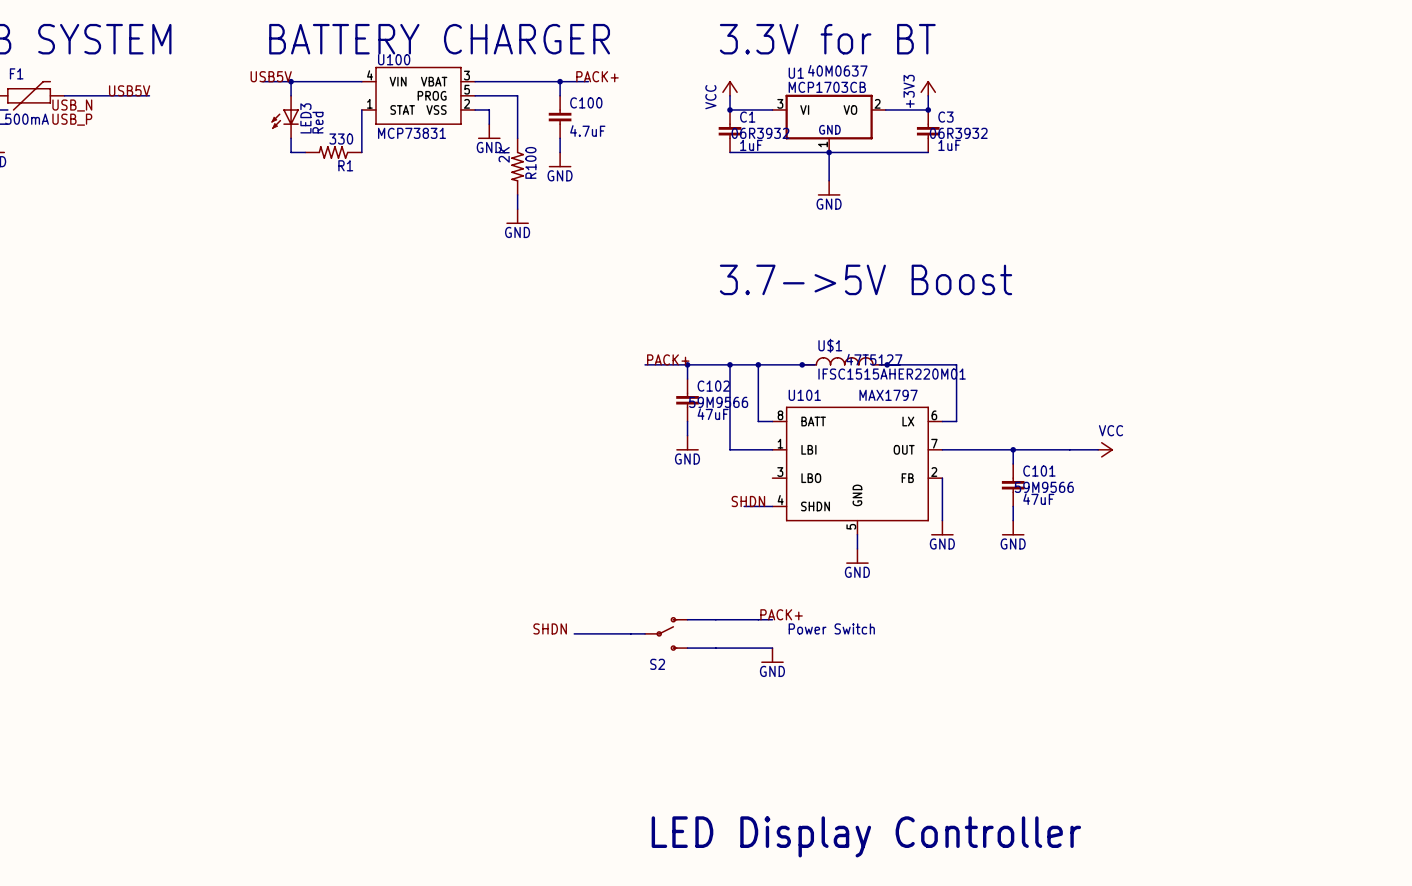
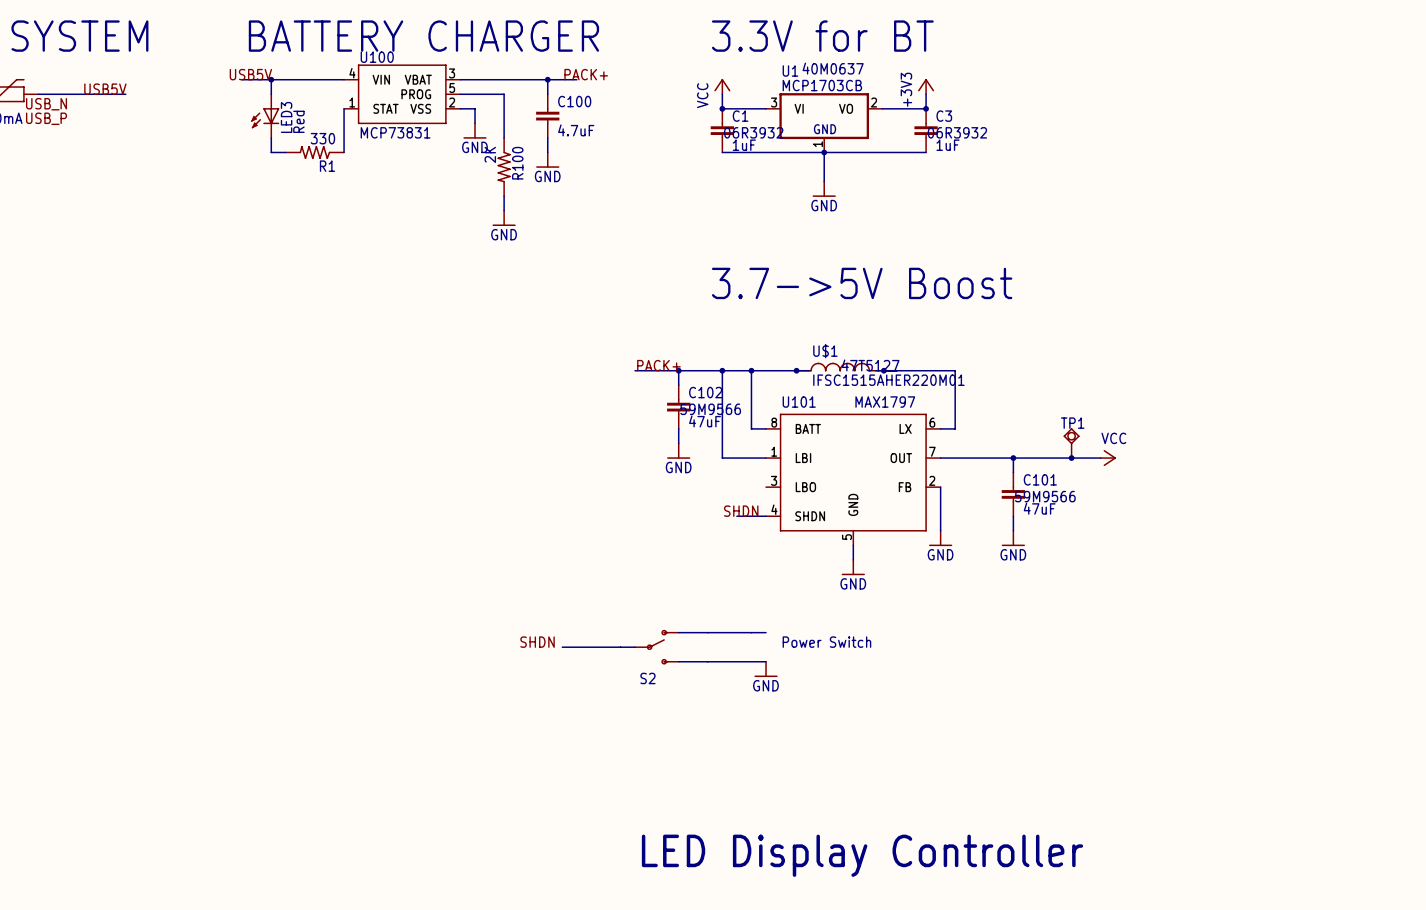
TP1: none -> (1071, 443)
junction: none -> (1071, 458)
label: PACK+ (781, 614) -> none

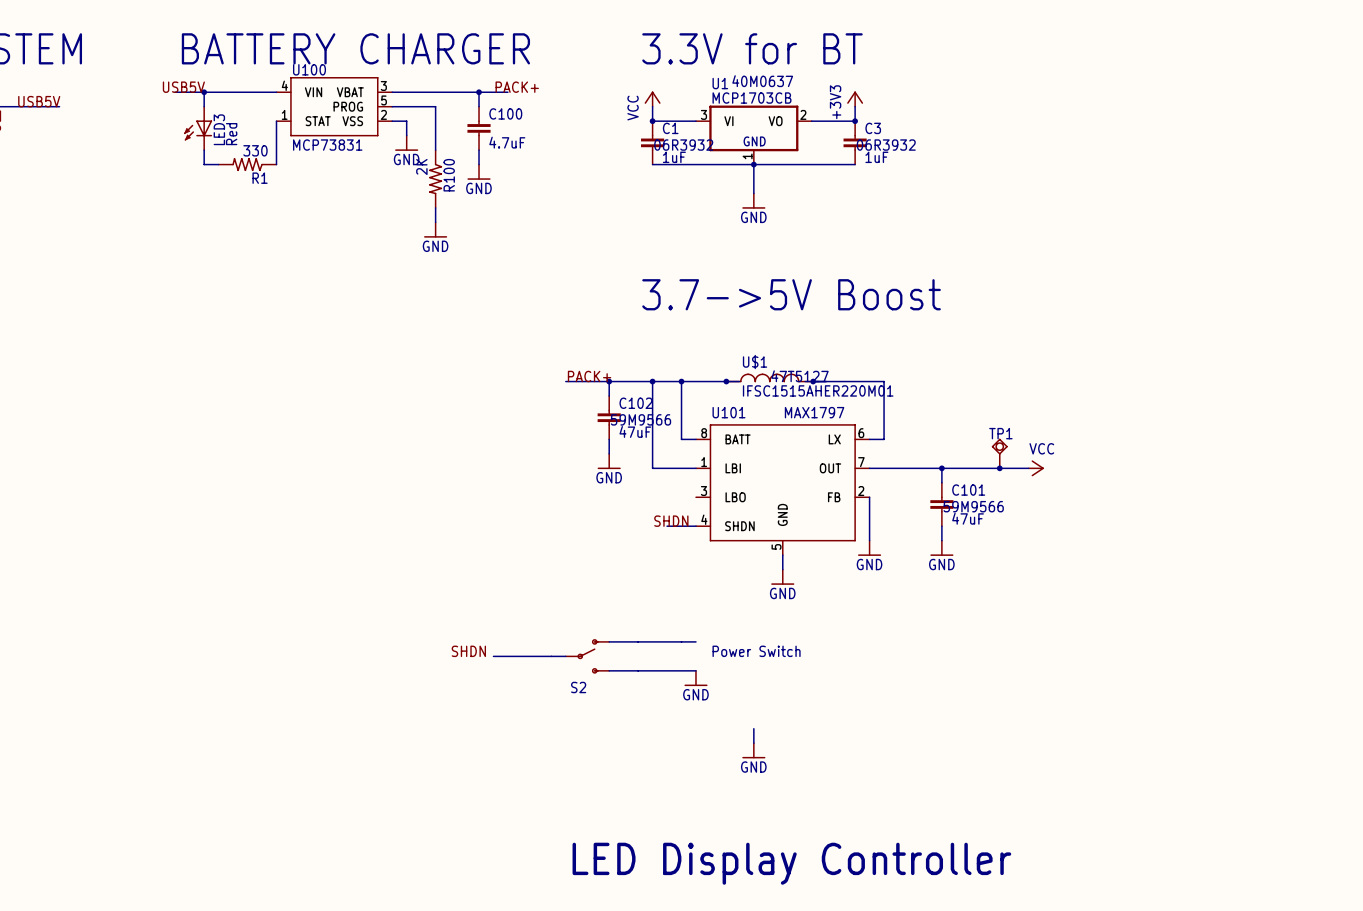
wire: none -> (753, 728) (753, 743)
power symbol: none -> GND (753, 750)

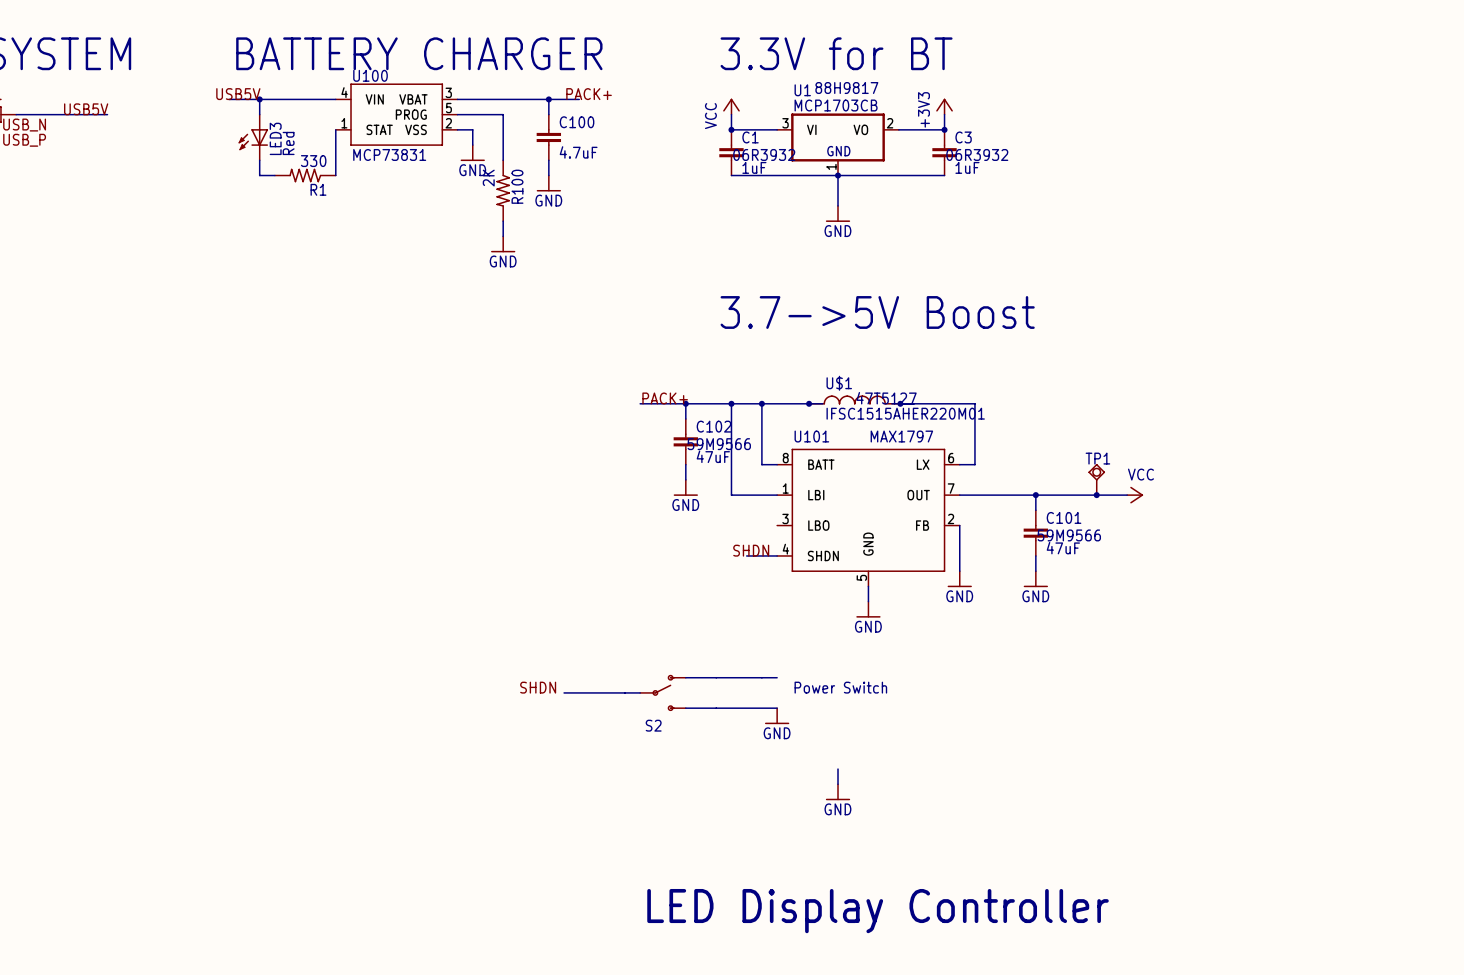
U1 text: 40M0637 (762, 81) -> 88H9817 (846, 88)

